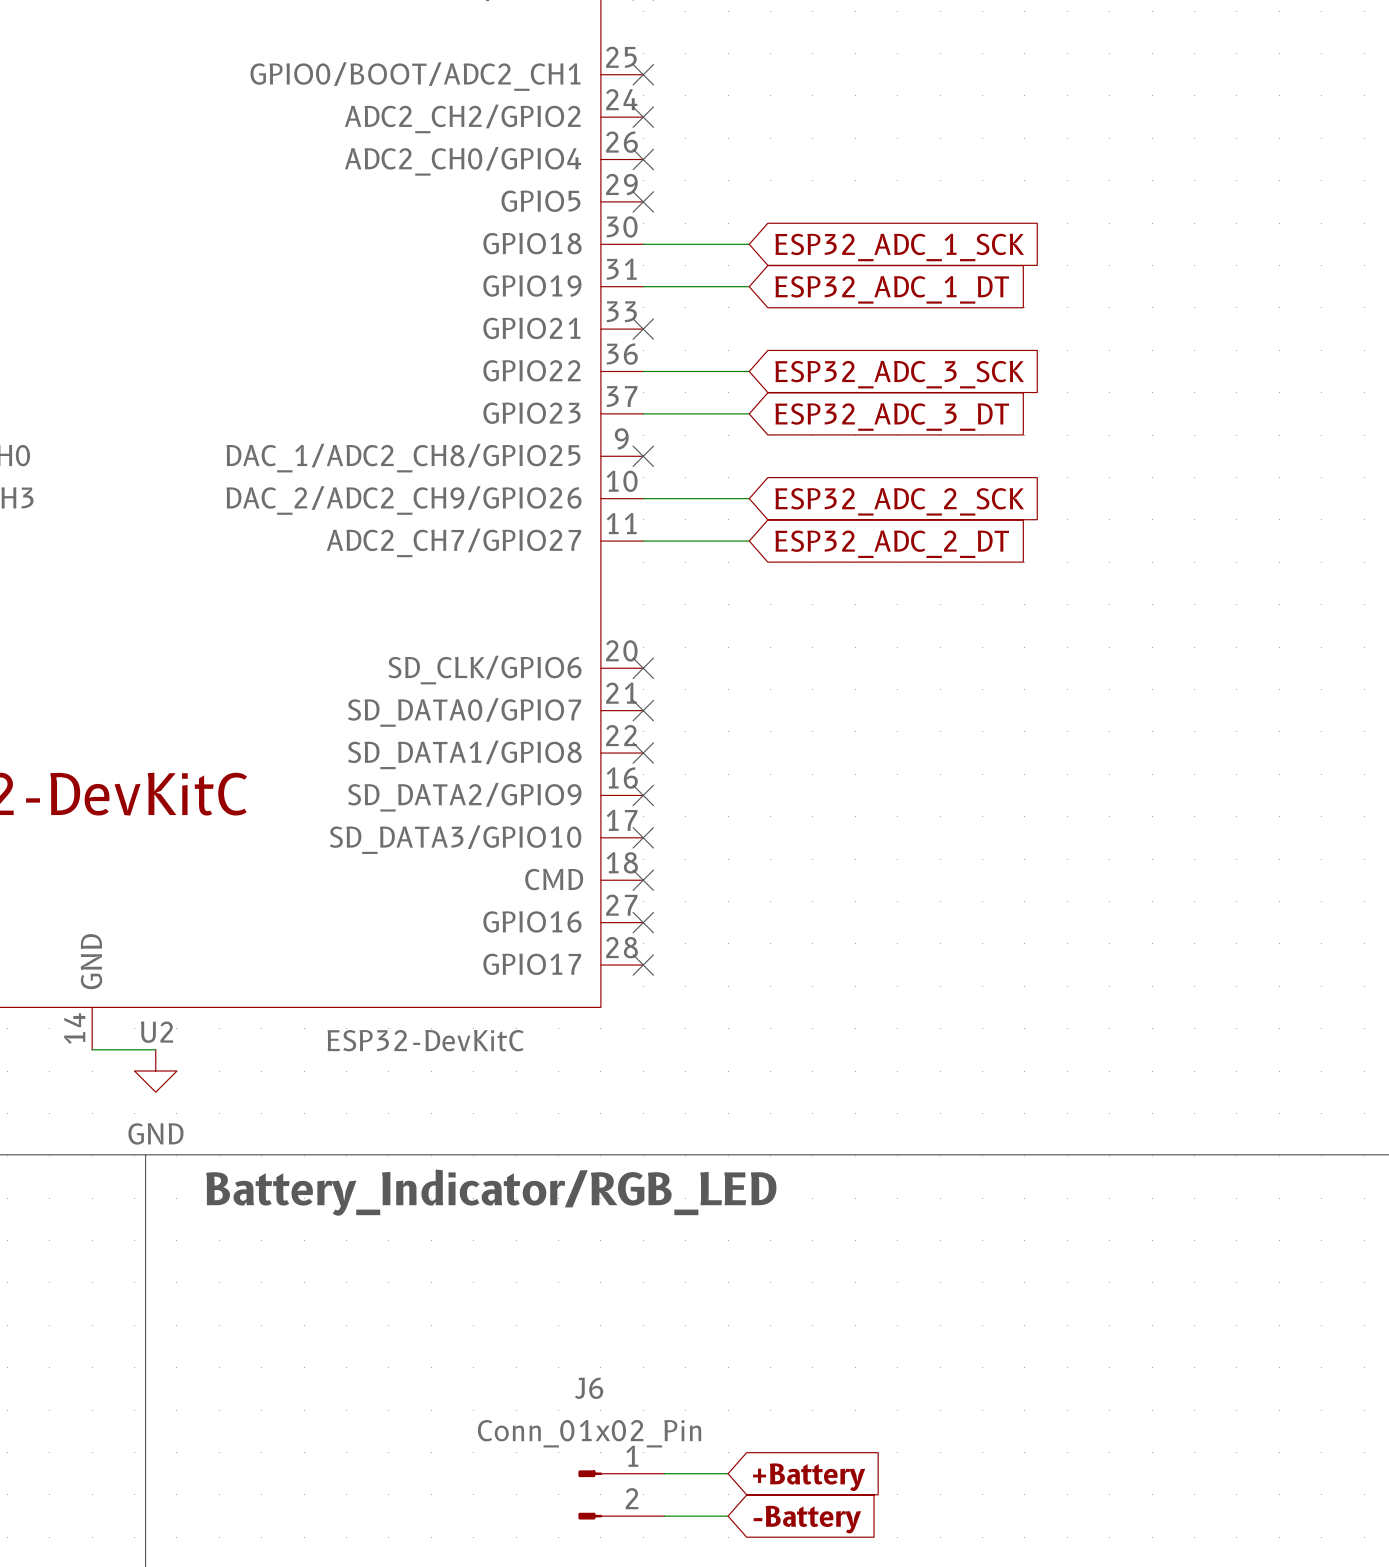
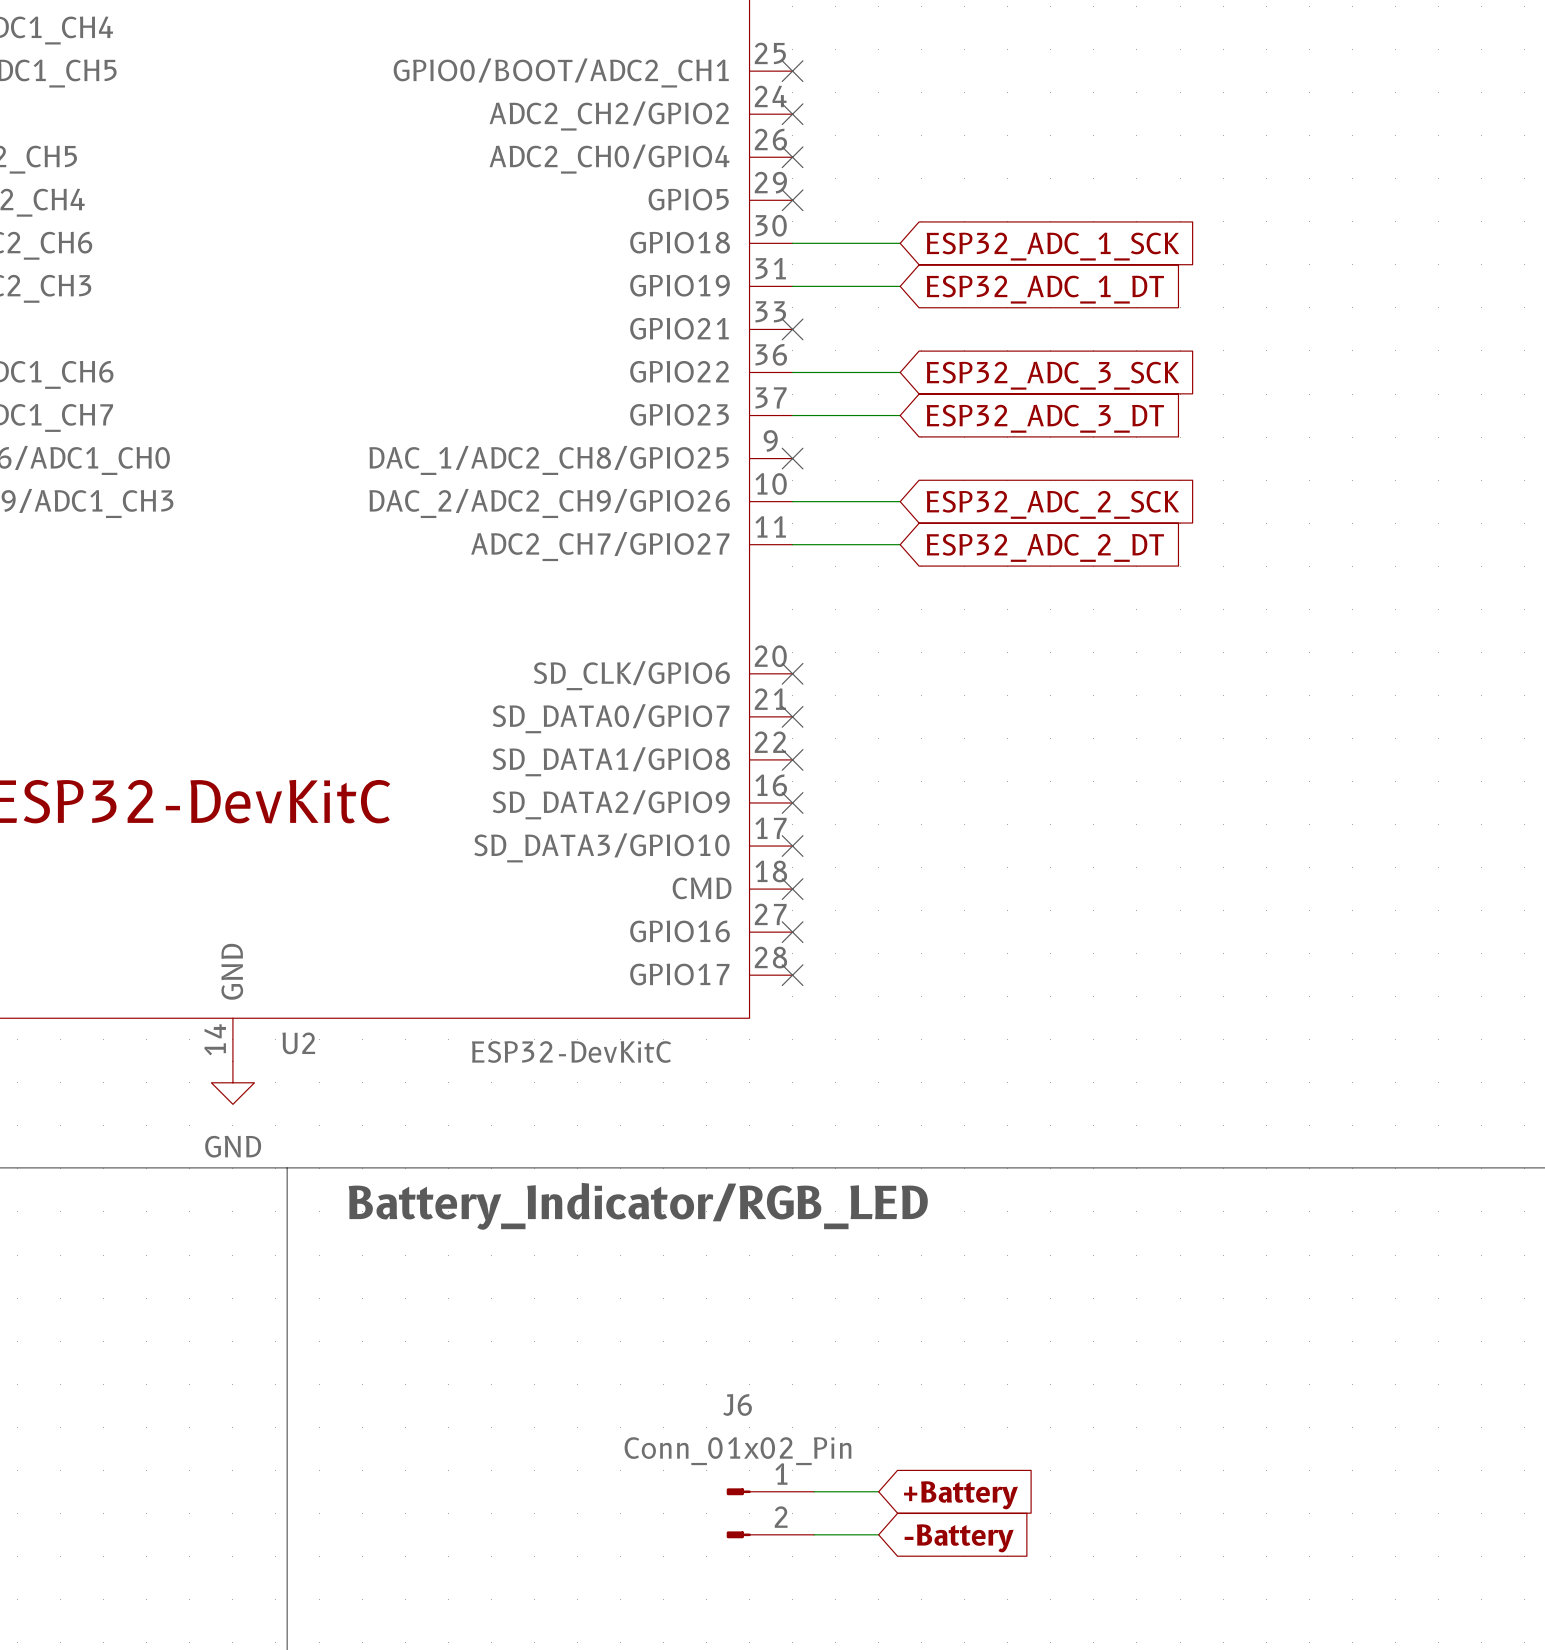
wire: (92, 1049) (155, 1049) -> none
power symbol position: GND (155, 1071) -> GND (232, 1082)

